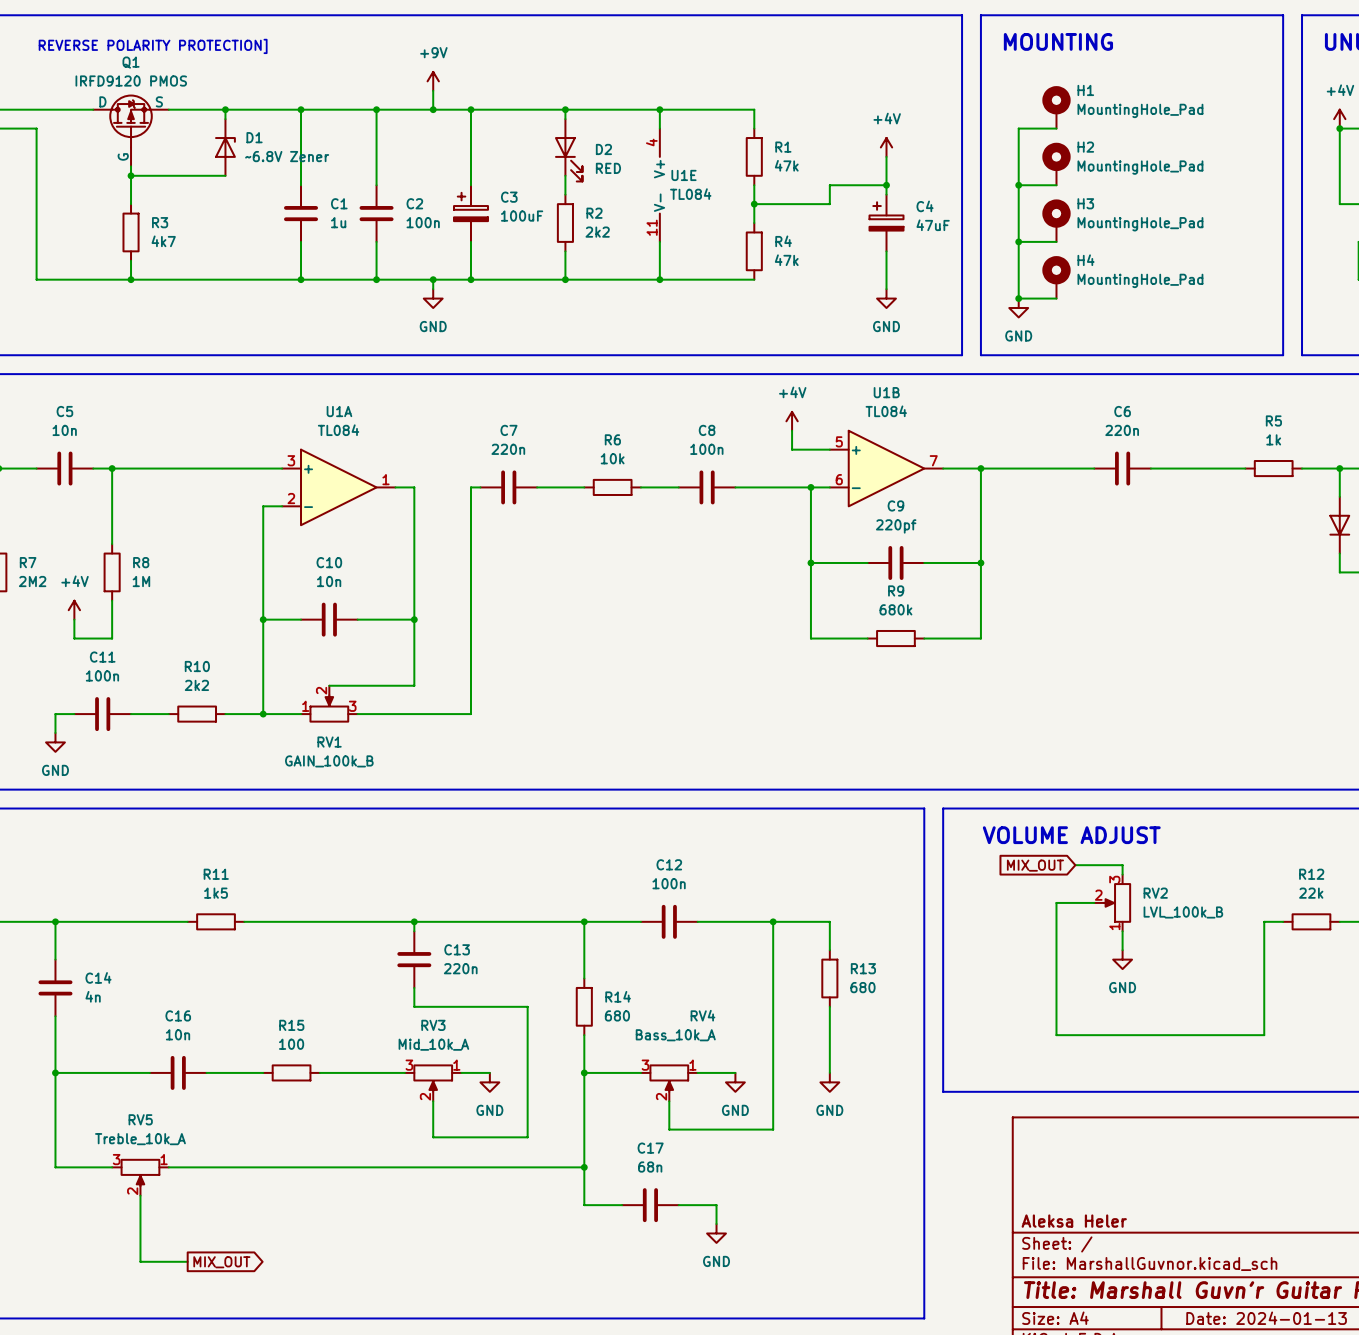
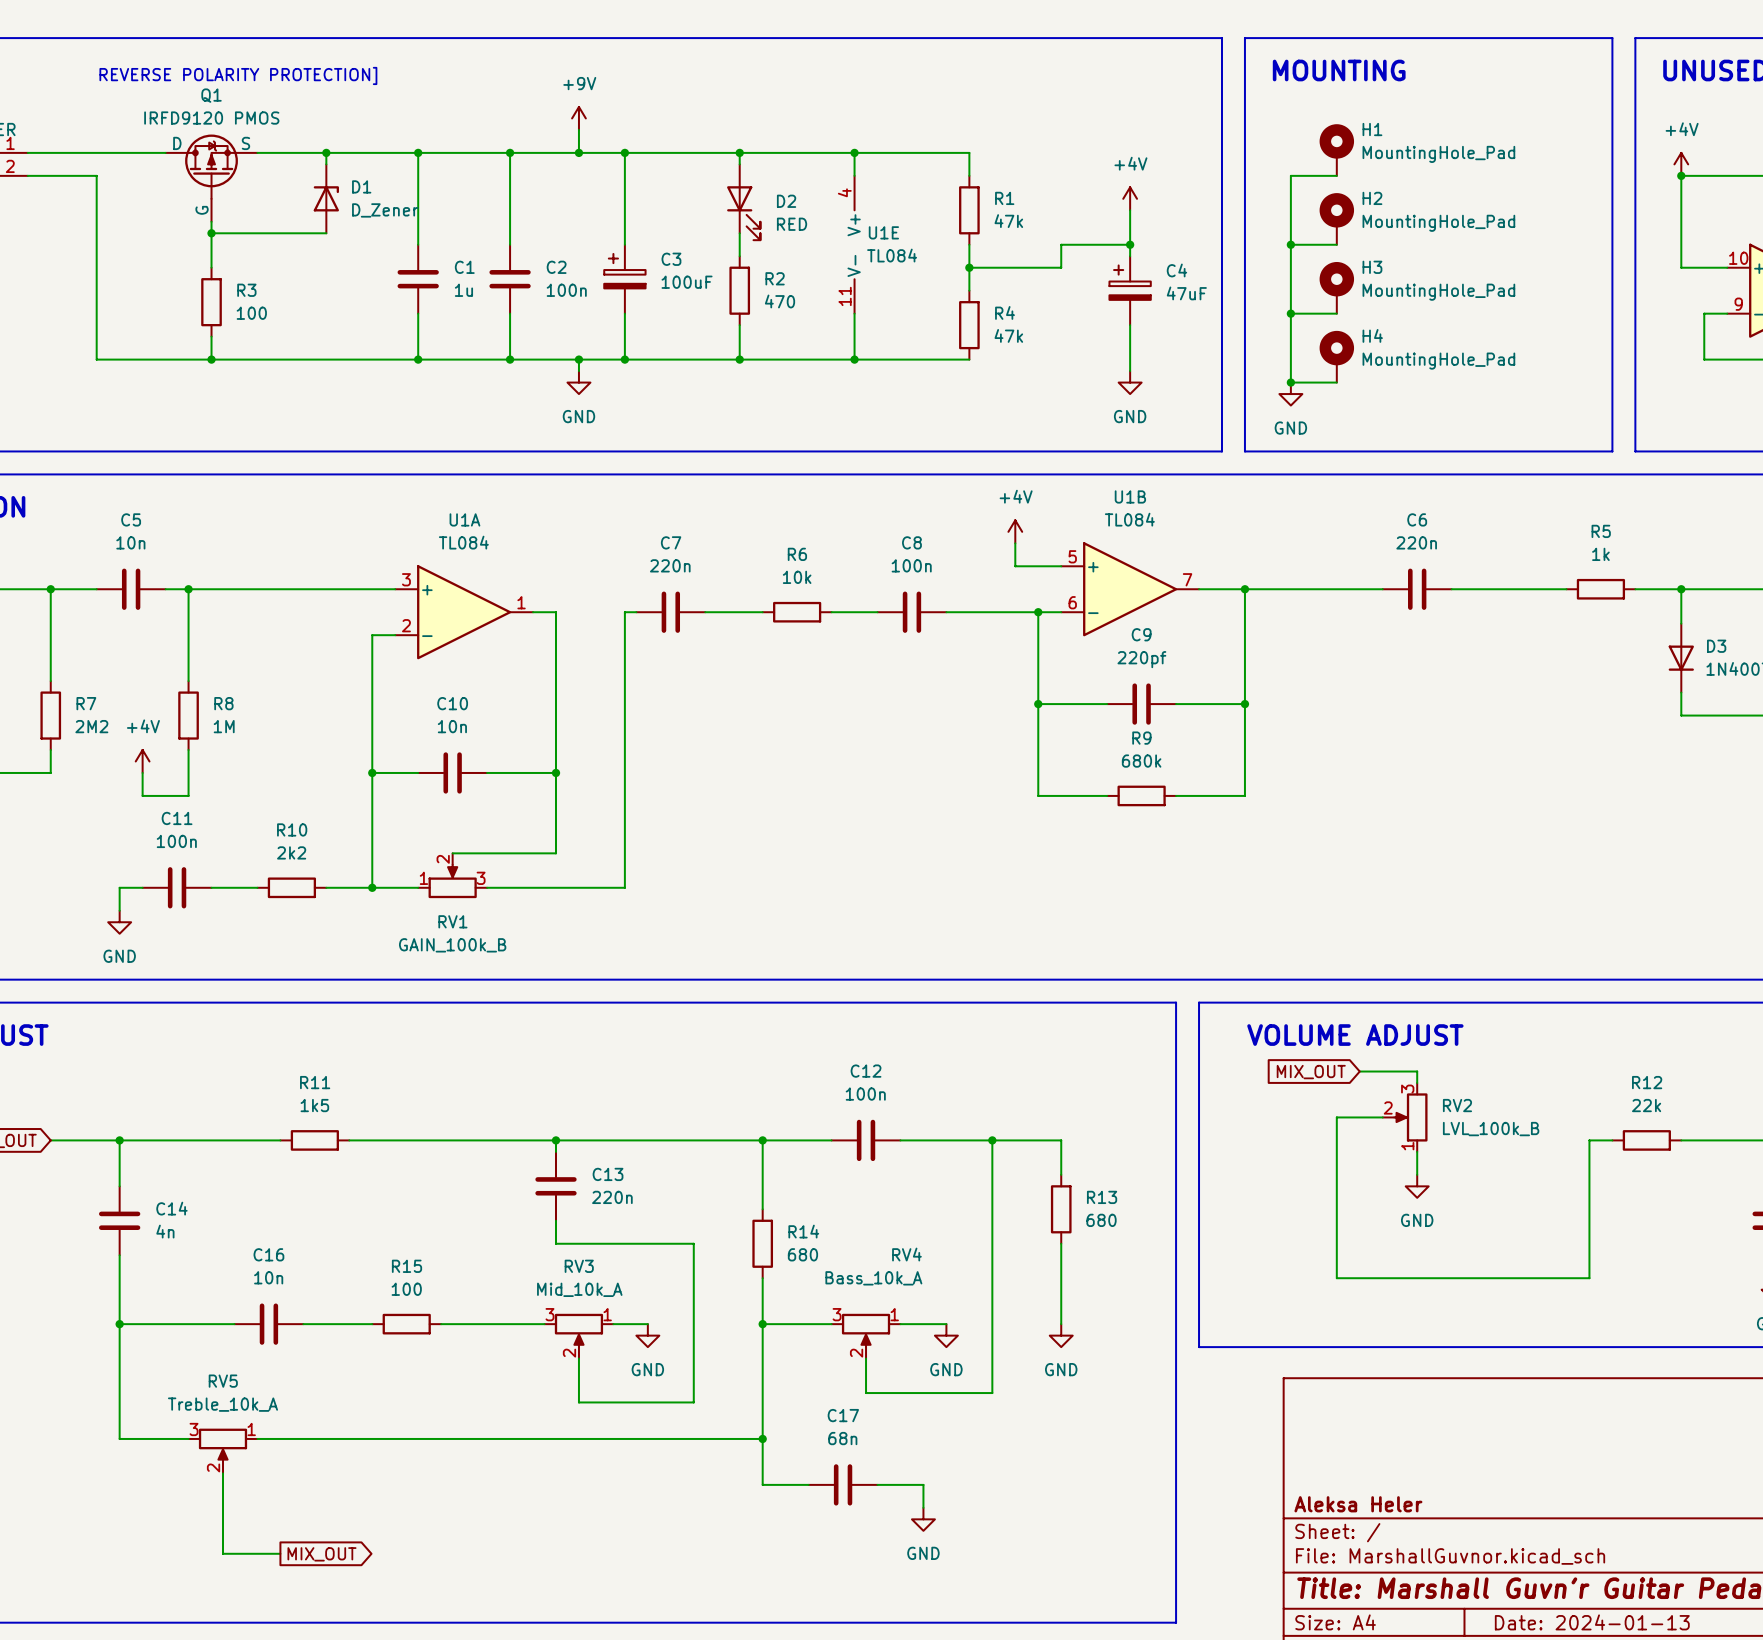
D1 value: ~6.8V Zener (287, 156) -> D_Zener (385, 210)
R2 value: 2k2 (597, 232) -> 470 (779, 301)
R3 value: 4k7 (163, 241) -> 100 (251, 313)

